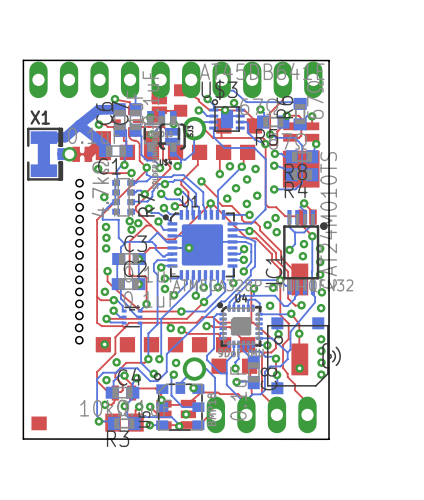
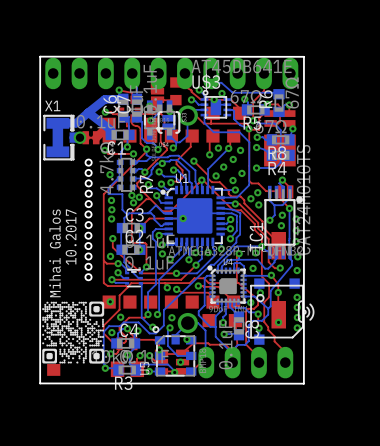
text: none -> 10.2017 (71, 237)
text: none -> Mihai Galos (55, 253)
hole: (79, 327) -> none
hole: (79, 340) -> none
drawing: none -> [42, 301, 105, 364]

